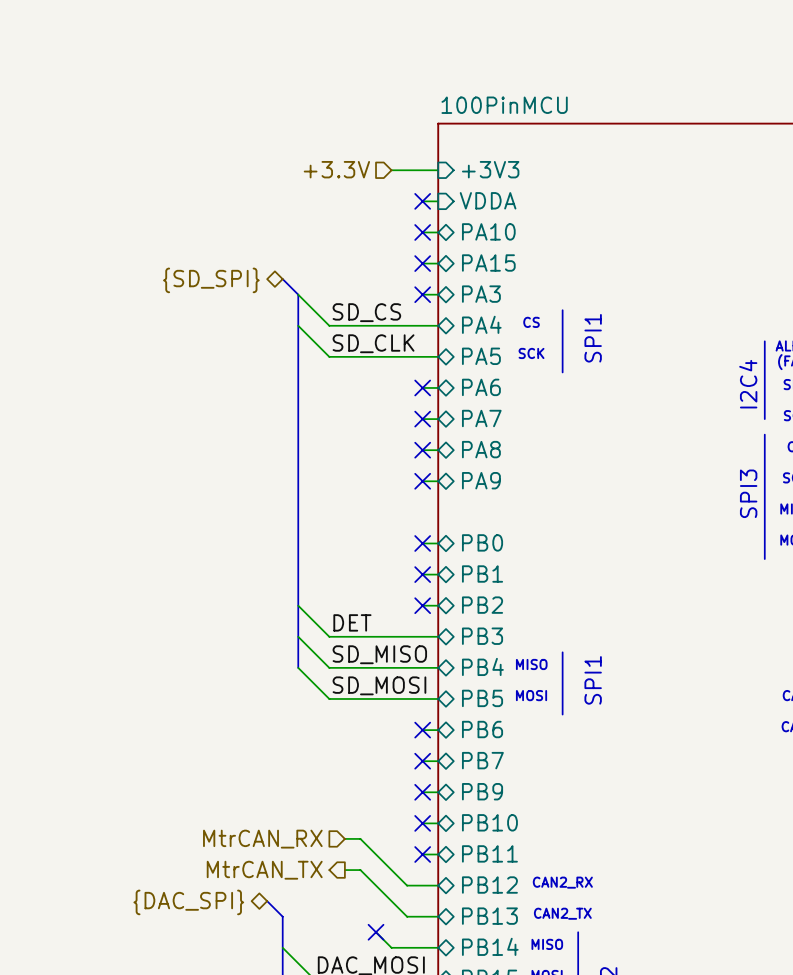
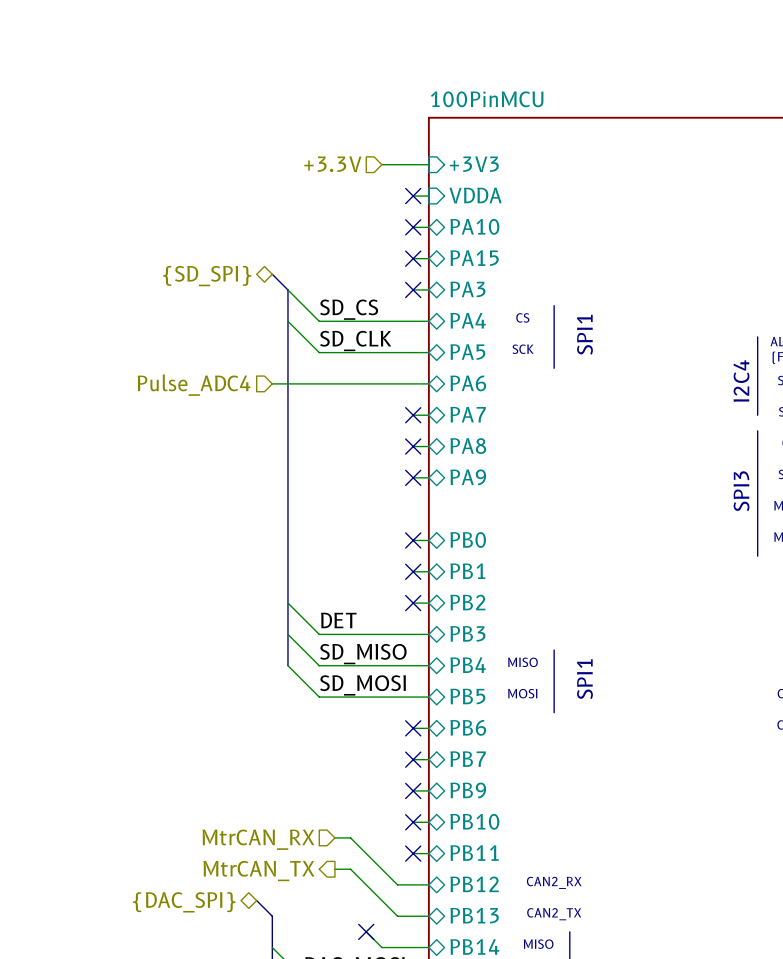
hierarchical label: none -> Pulse_ADC4 (194, 385)
wire: none -> (272, 383) (413, 383)
no-connect mark: (422, 387) -> none

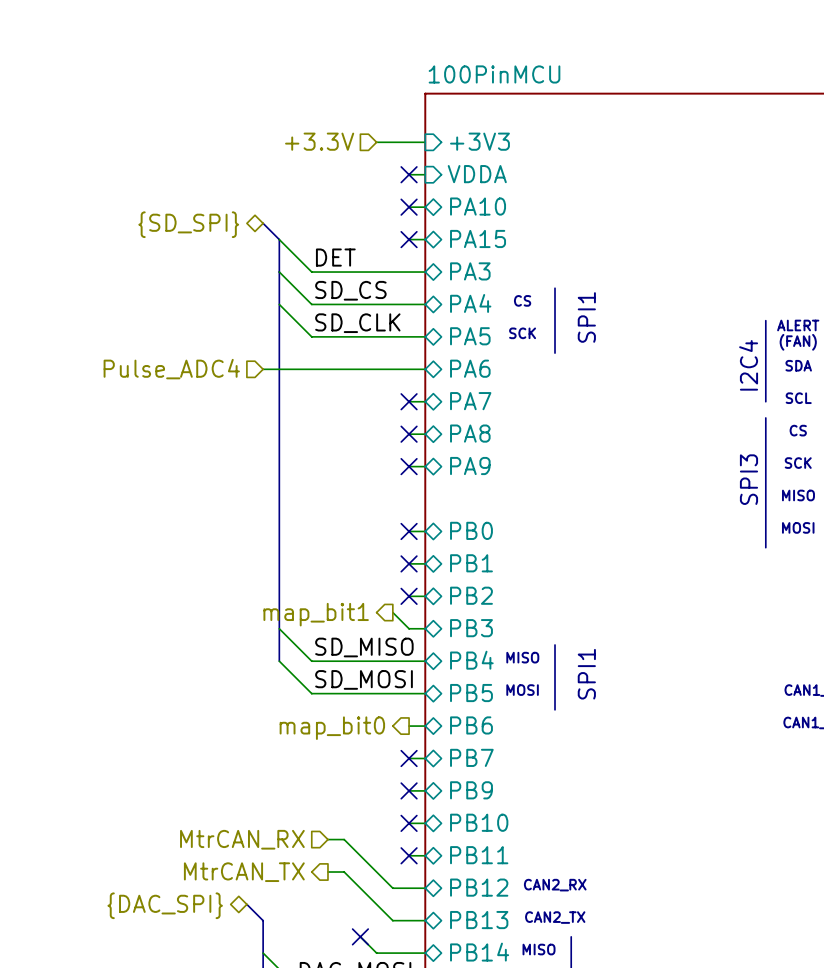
wire: none -> (279, 239) (311, 272) (409, 272)
bus: (272, 274) (287, 289) -> (263, 223) (279, 239) (279, 272)
hierarchical label position: {SD_SPI} (207, 276) -> {SD_SPI} (188, 224)
label: none -> DET (335, 257)
no-connect mark: (413, 289) -> none
wire: (287, 603) (319, 634) (413, 634) -> (392, 612) (409, 628)
hierarchical label: none -> map_bit1 (316, 614)
label: DET (338, 620) -> none
no-connect mark: (413, 728) -> none
hierarchical label: none -> map_bit0 (332, 728)

